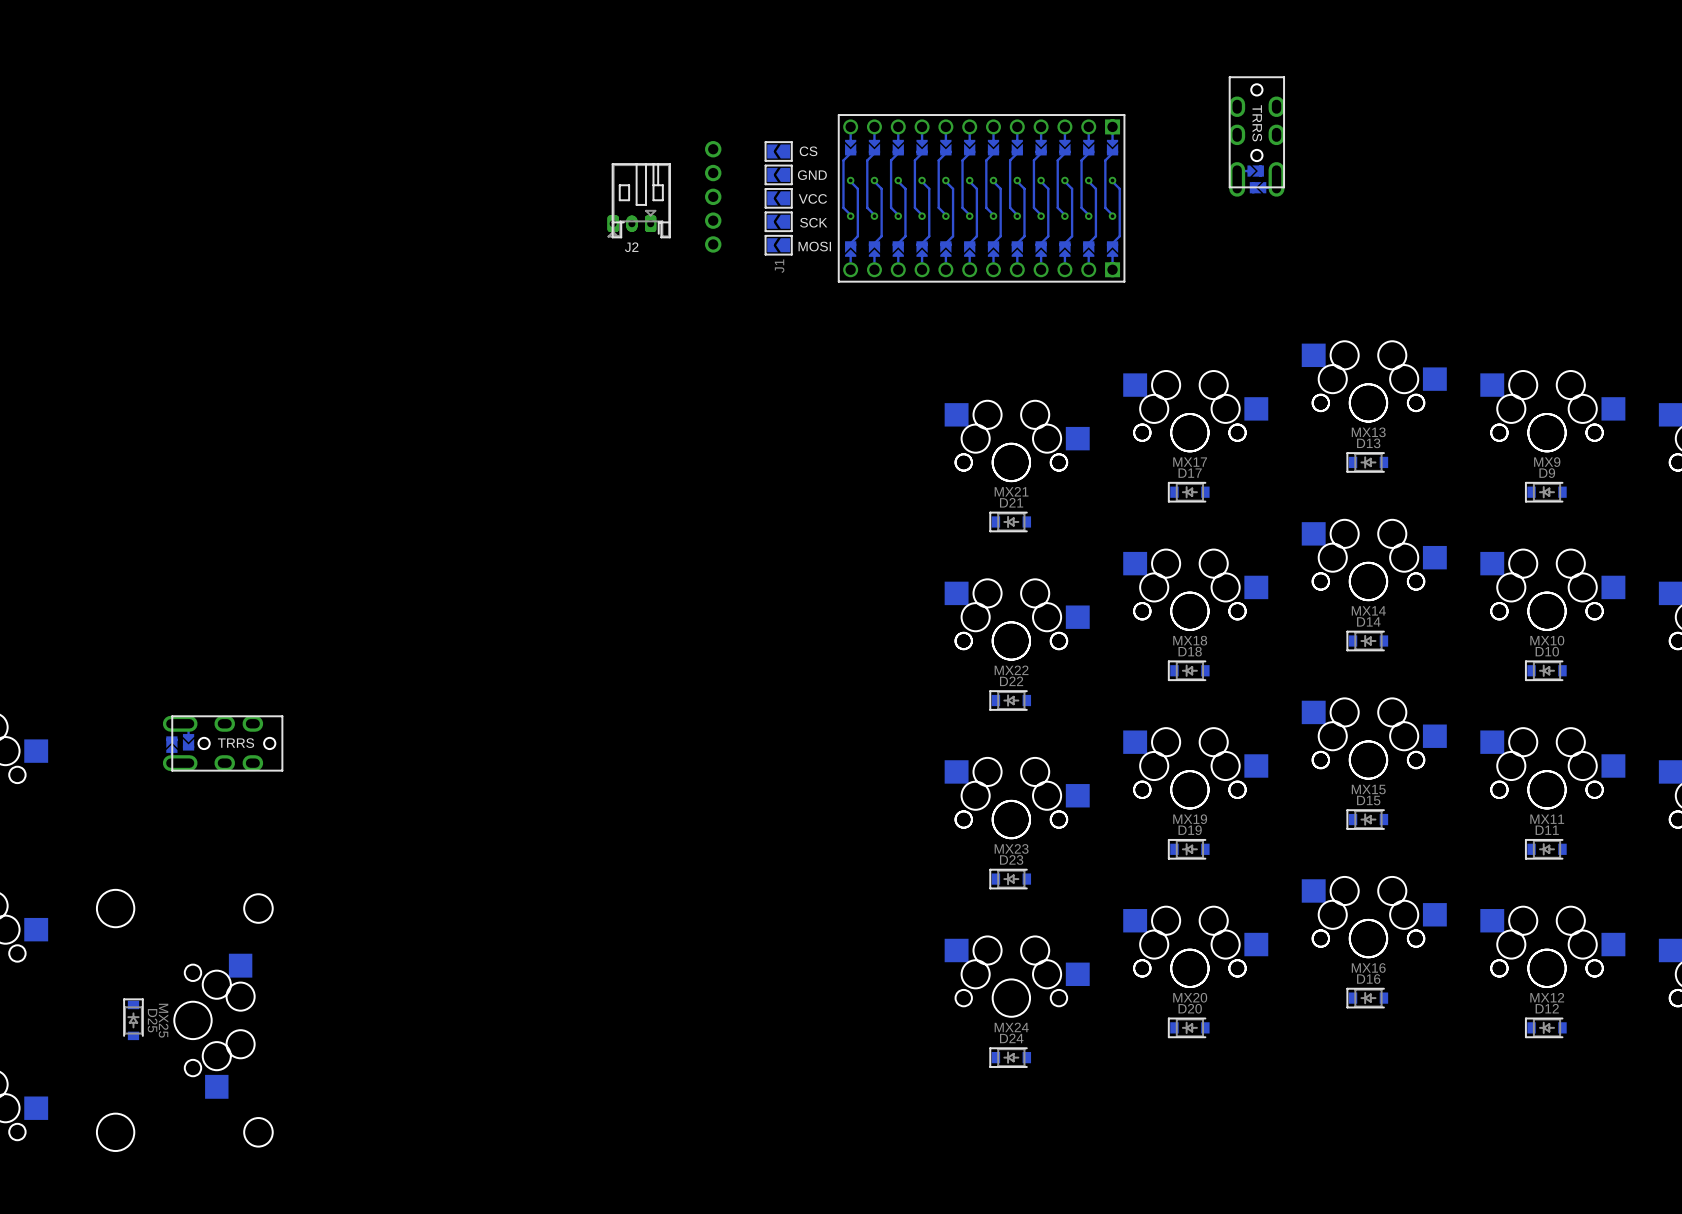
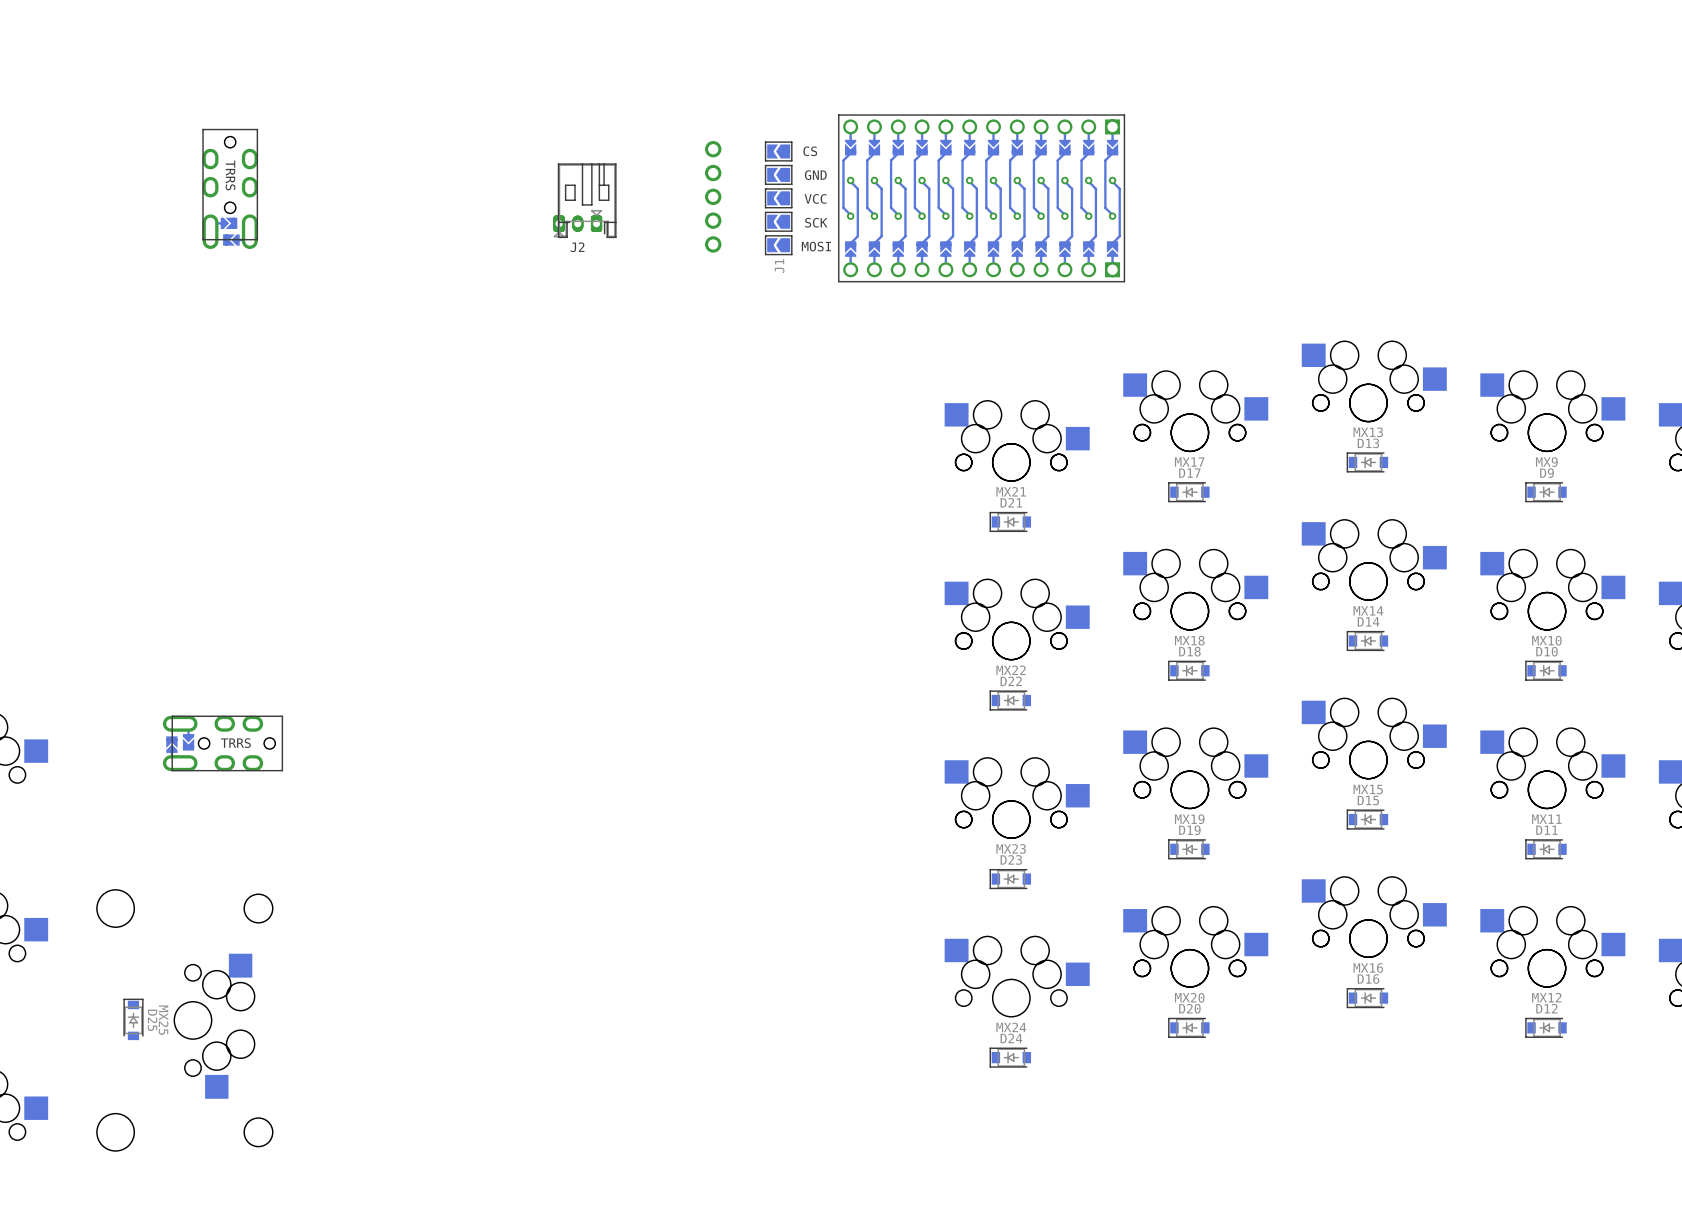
part: (1256, 136) -> none
part: none -> (230, 188)
J2 position: (639, 200) -> (584, 200)

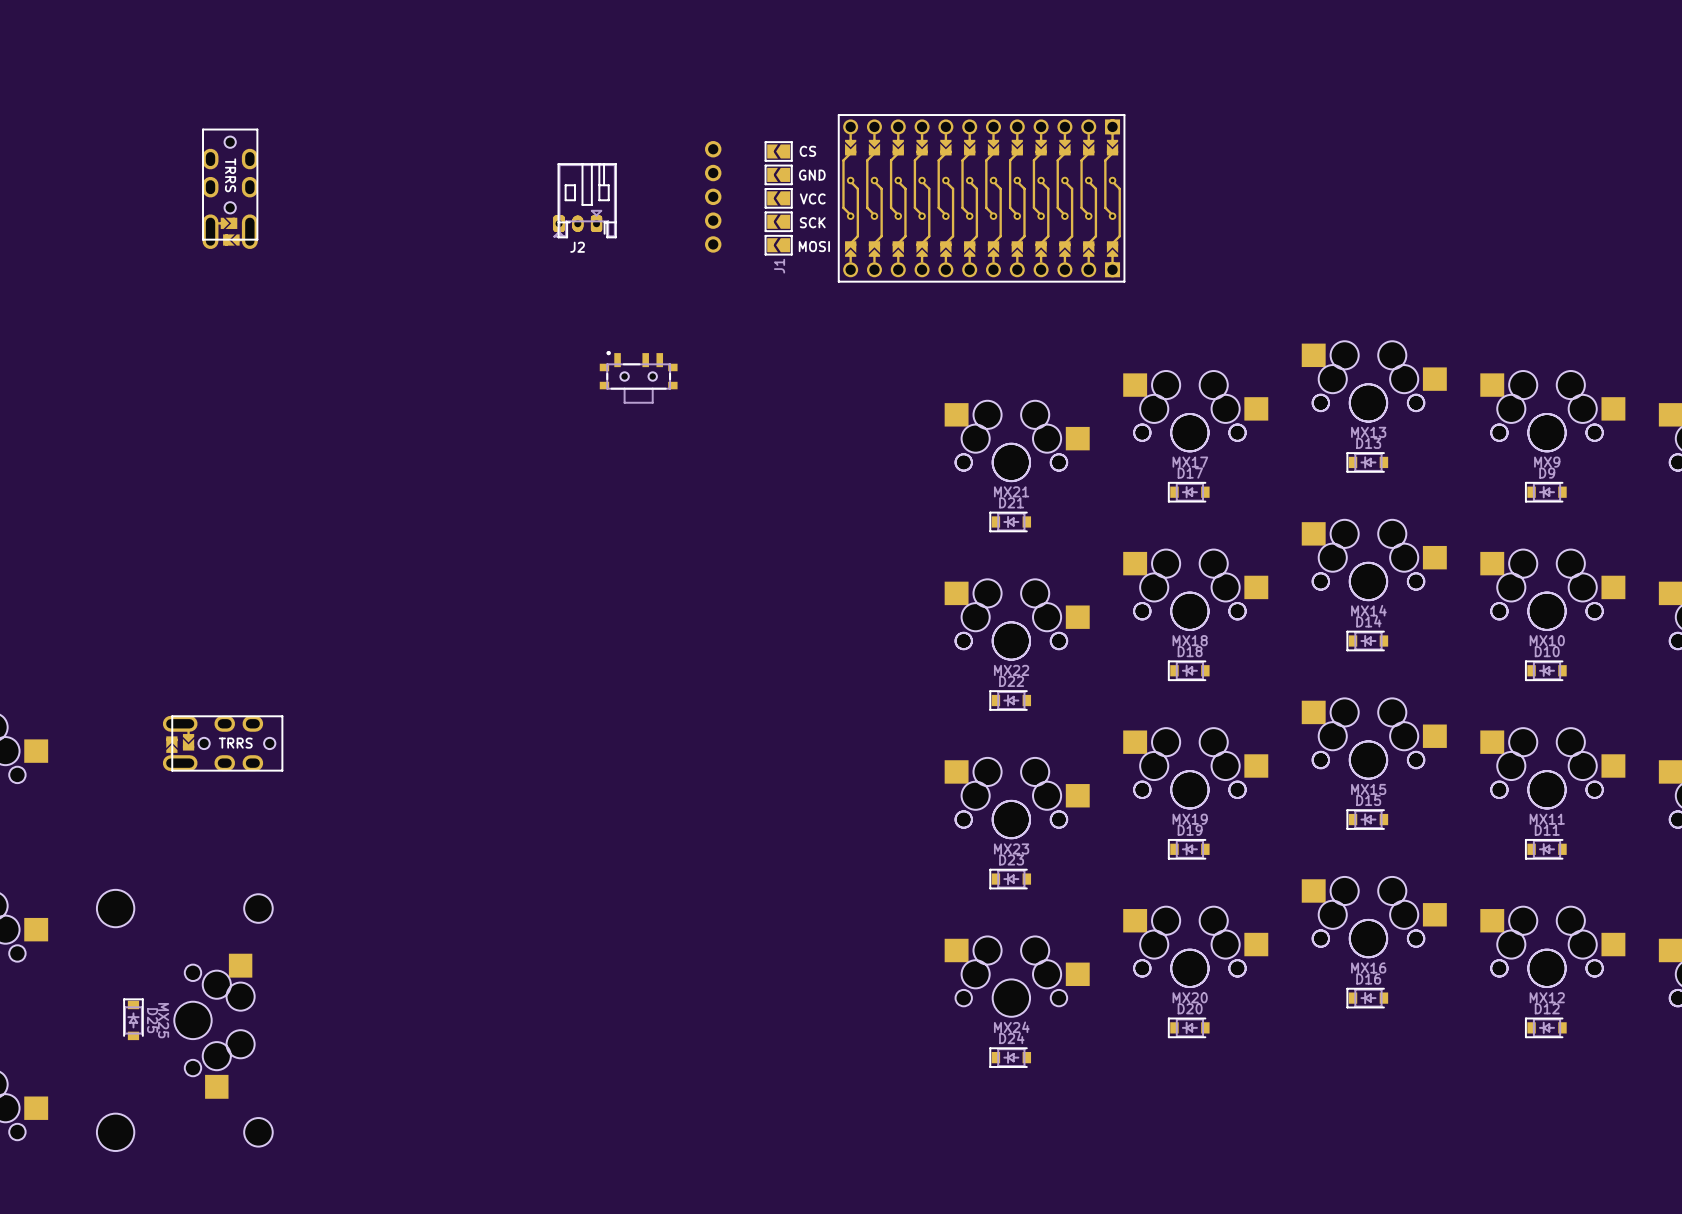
part: none -> (638, 377)

